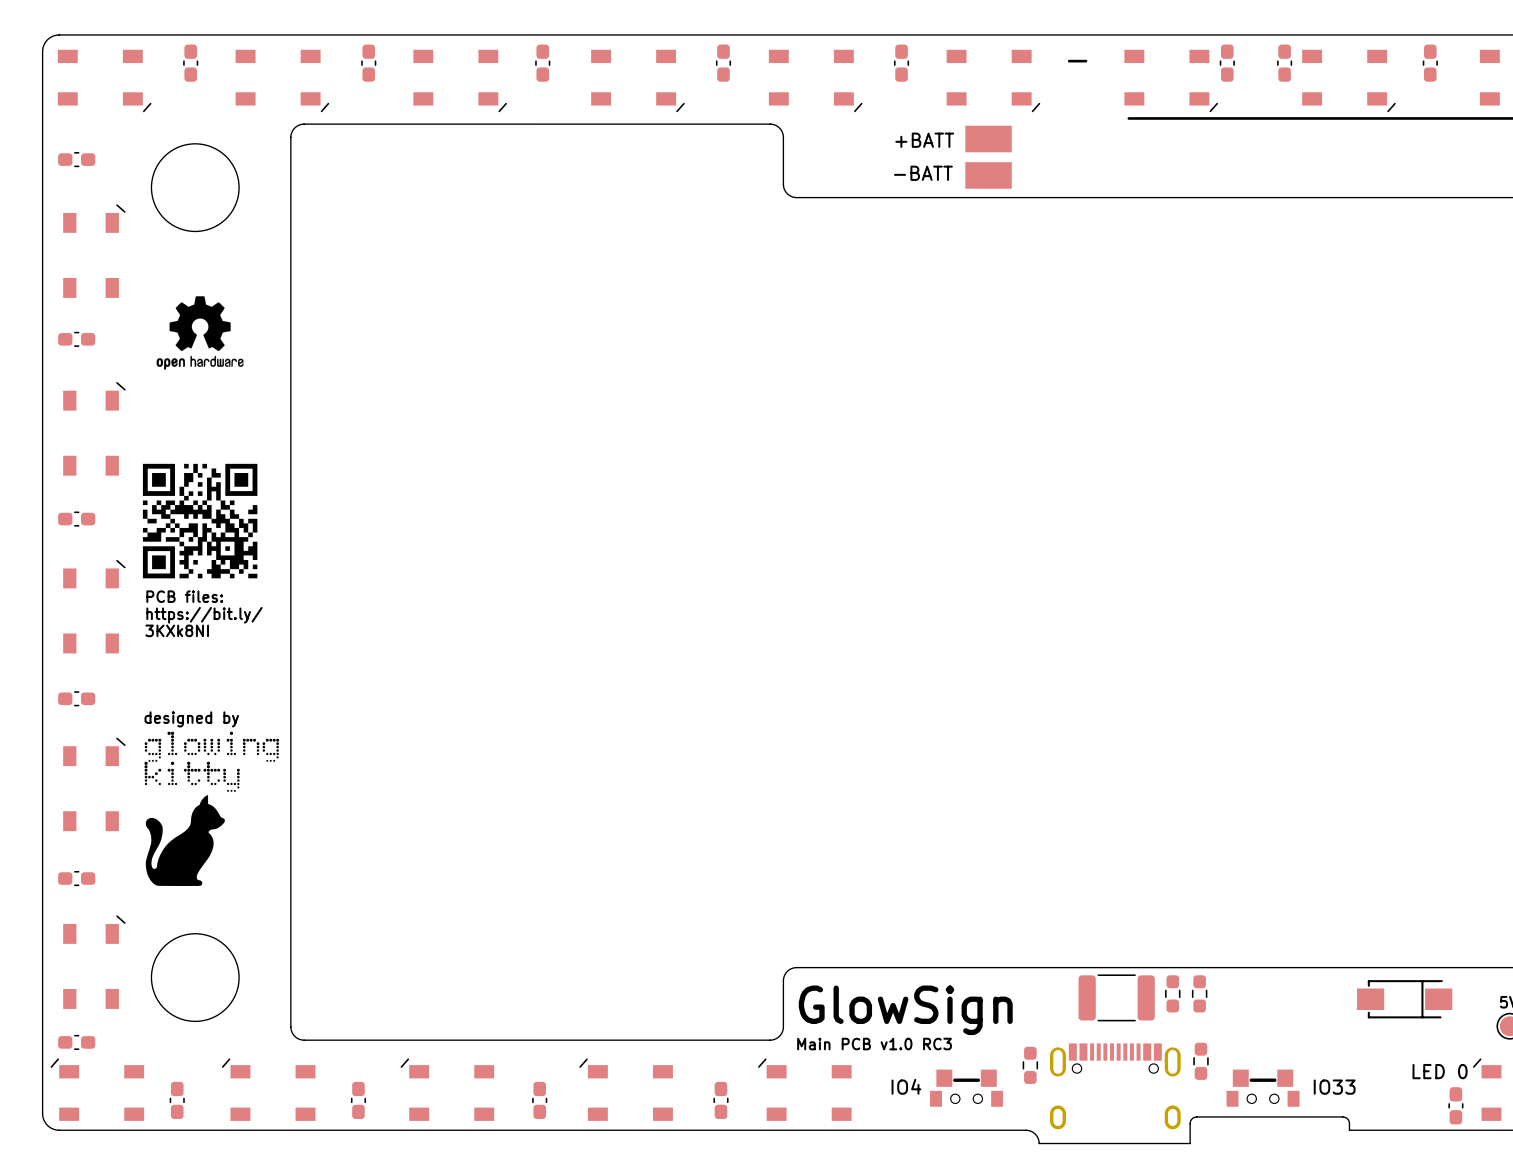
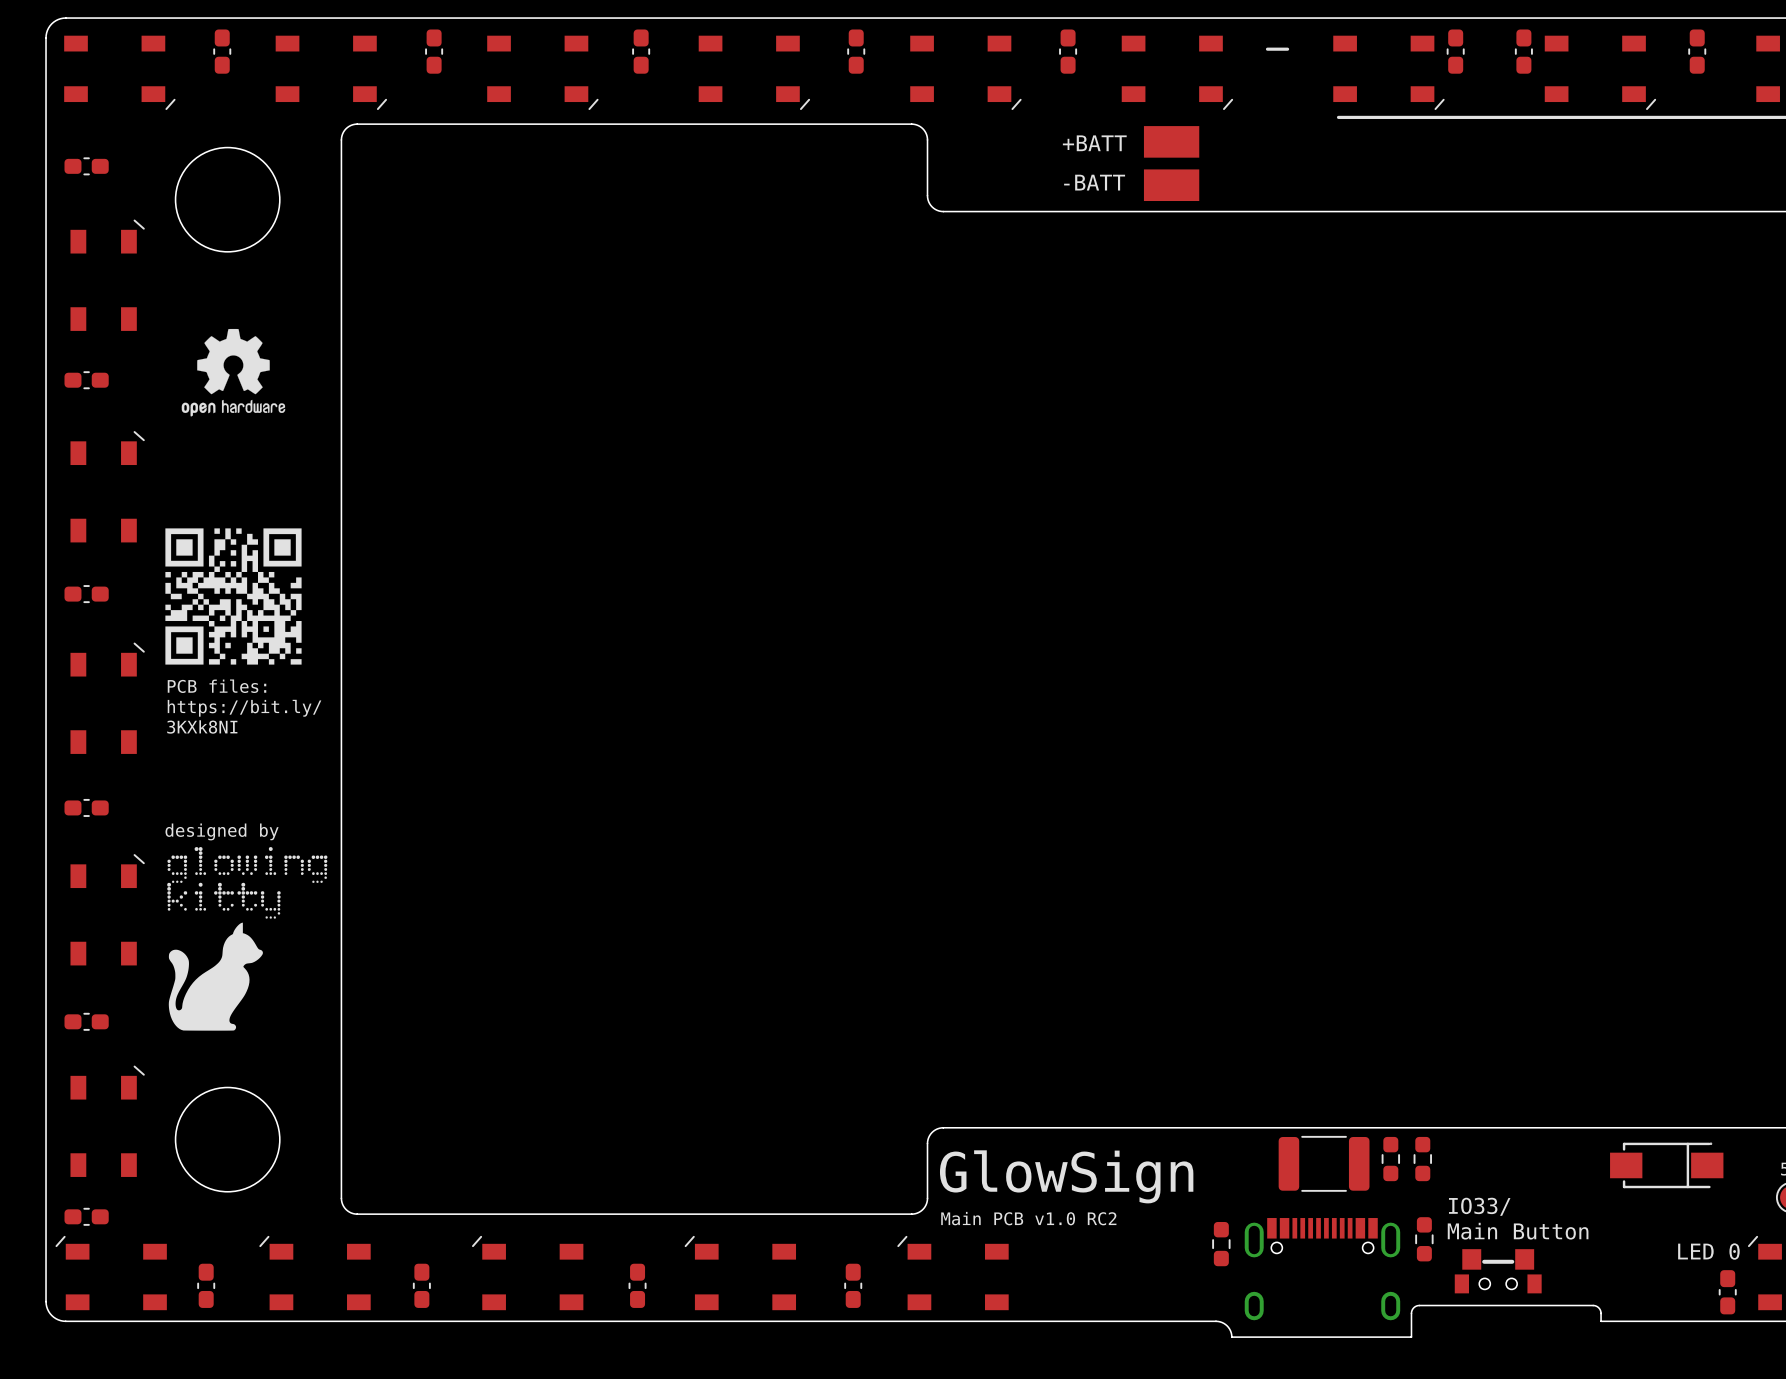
text: none -> IO33/ (1479, 1206)
text: Main PCB v1.0 RC3 (874, 1044) -> Main PCB v1.0 RC2 (1028, 1218)
text: none -> Main Button (1518, 1231)
text: IO4 (906, 1086) -> none
text: IO33 (1334, 1087) -> none
part: (966, 1088) -> none

